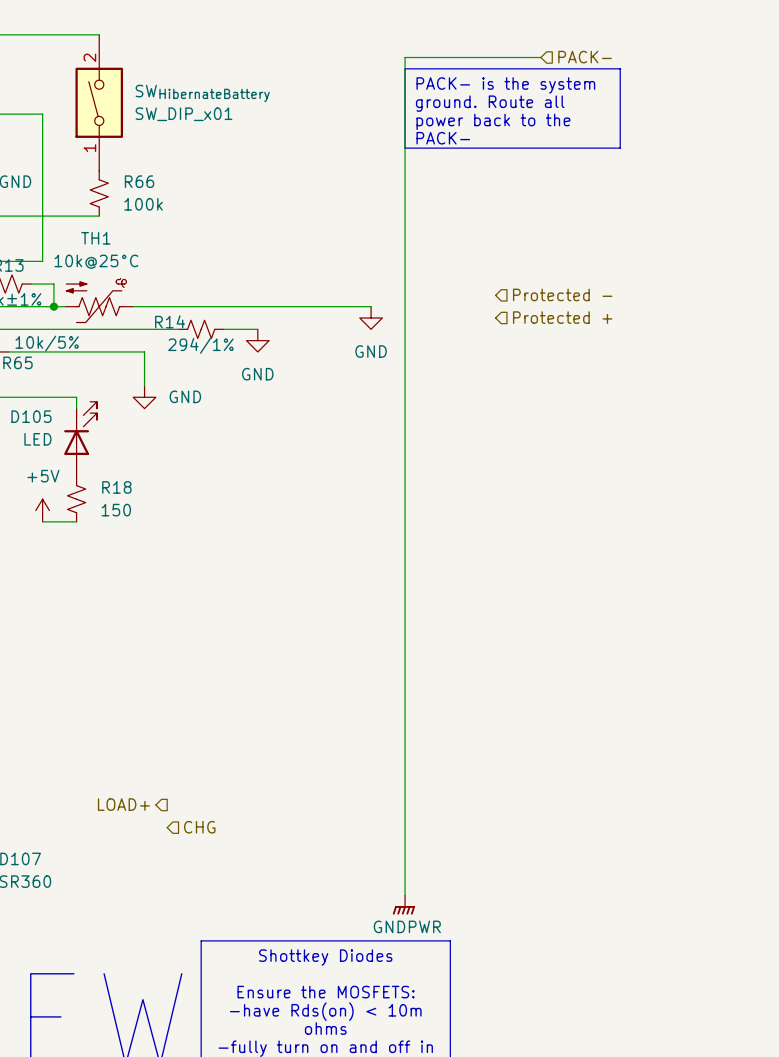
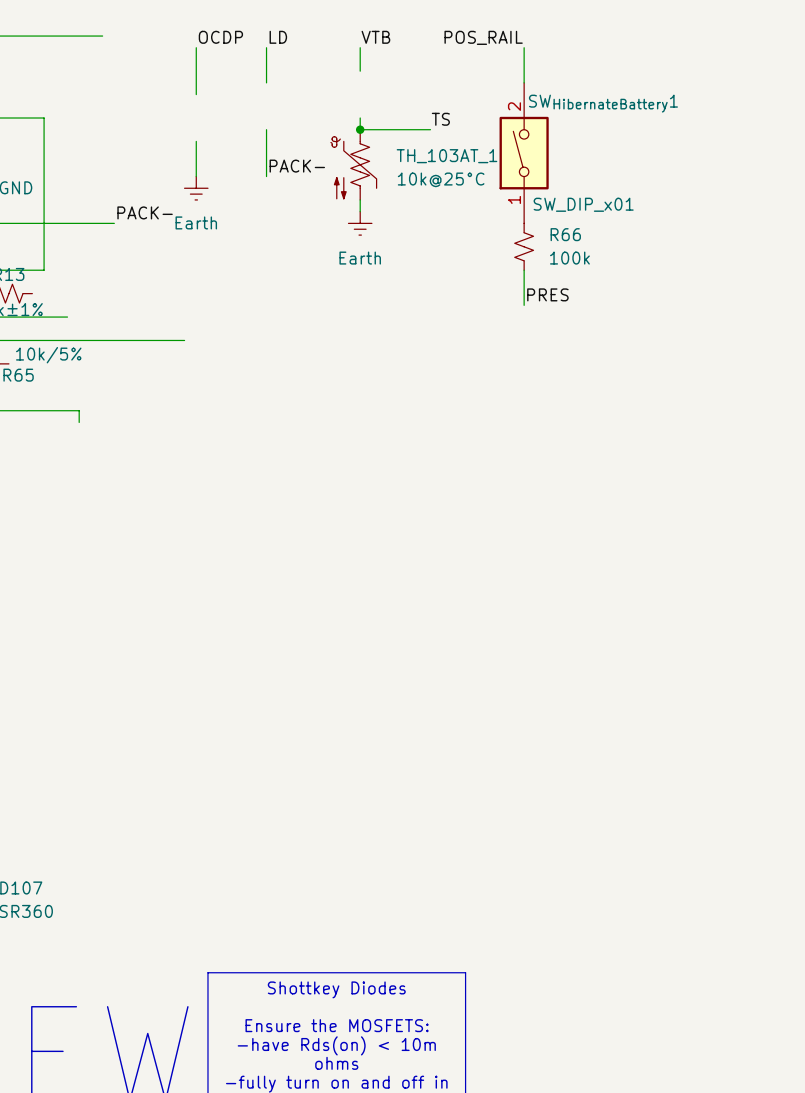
label: none -> OCDP (220, 37)
label: none -> LD (278, 37)
label: none -> VTB (375, 37)
label: none -> POS_RAIL (483, 37)
wire: none -> (196, 47) (196, 94)
wire: none -> (266, 47) (266, 82)
wire: none -> (360, 47) (360, 71)
wire: none -> (524, 47) (524, 82)
wire: (540, 57) (405, 57) (405, 895) -> none
hierarchical label: PACK- (585, 57) -> none
line: (405, 68) (620, 68) (620, 148) (405, 148) (405, 68) -> none
text: PACK- is the system (505, 85) -> none
SWHibernateBattery: SW_DIP_x01 (99, 102) -> none
text: ground. Route all (490, 103) -> none
wire: none -> (360, 118) (360, 129) (430, 129)
label: none -> TS (440, 119)
text: power back to the (493, 121) -> none
wire: none -> (266, 129) (266, 176)
junction: none -> (360, 129)
wire: none -> (196, 141) (196, 176)
text: PACK- (443, 138) -> none
SWHibernateBattery1: none -> SW_DIP_x01 (524, 153)
TH_103AT_1: none -> 10k@25°C (353, 164)
label: none -> PACK- (297, 166)
power symbol: none -> Earth (196, 188)
R66 position: (99, 193) -> (524, 246)
wire: none -> (360, 199) (360, 211)
label: none -> PACK- (145, 212)
wire: none -> (102, 223) (114, 223)
power symbol: none -> Earth (360, 223)
wire: none -> (524, 270) (524, 305)
wire: (31, 284) (53, 284) (53, 306) -> none
label: none -> PRES (547, 294)
hierarchical label: Protected - (562, 294) -> none
TH1: 10k@25°C (99, 300) -> none
junction: (53, 306) -> none
wire: (133, 306) (371, 306) -> none
hierarchical label: Protected + (562, 317) -> none
power symbol: GND (371, 318) -> none
R14: 294/1% (201, 329) -> none
wire: (223, 329) (257, 329) -> none
power symbol: GND (257, 340) -> none
wire: (8, 351) (144, 351) (144, 385) -> none
power symbol: GND (144, 397) -> none
D105: LED (80, 439) -> none
R18: 150 (76, 499) -> none
power symbol: +5V (42, 510) -> none
wire: (42, 521) (76, 521) -> none
hierarchical label: LOAD+ (123, 804) -> none
hierarchical label: CHG (199, 827) -> none
power symbol: GNDPWR (403, 905) -> none

